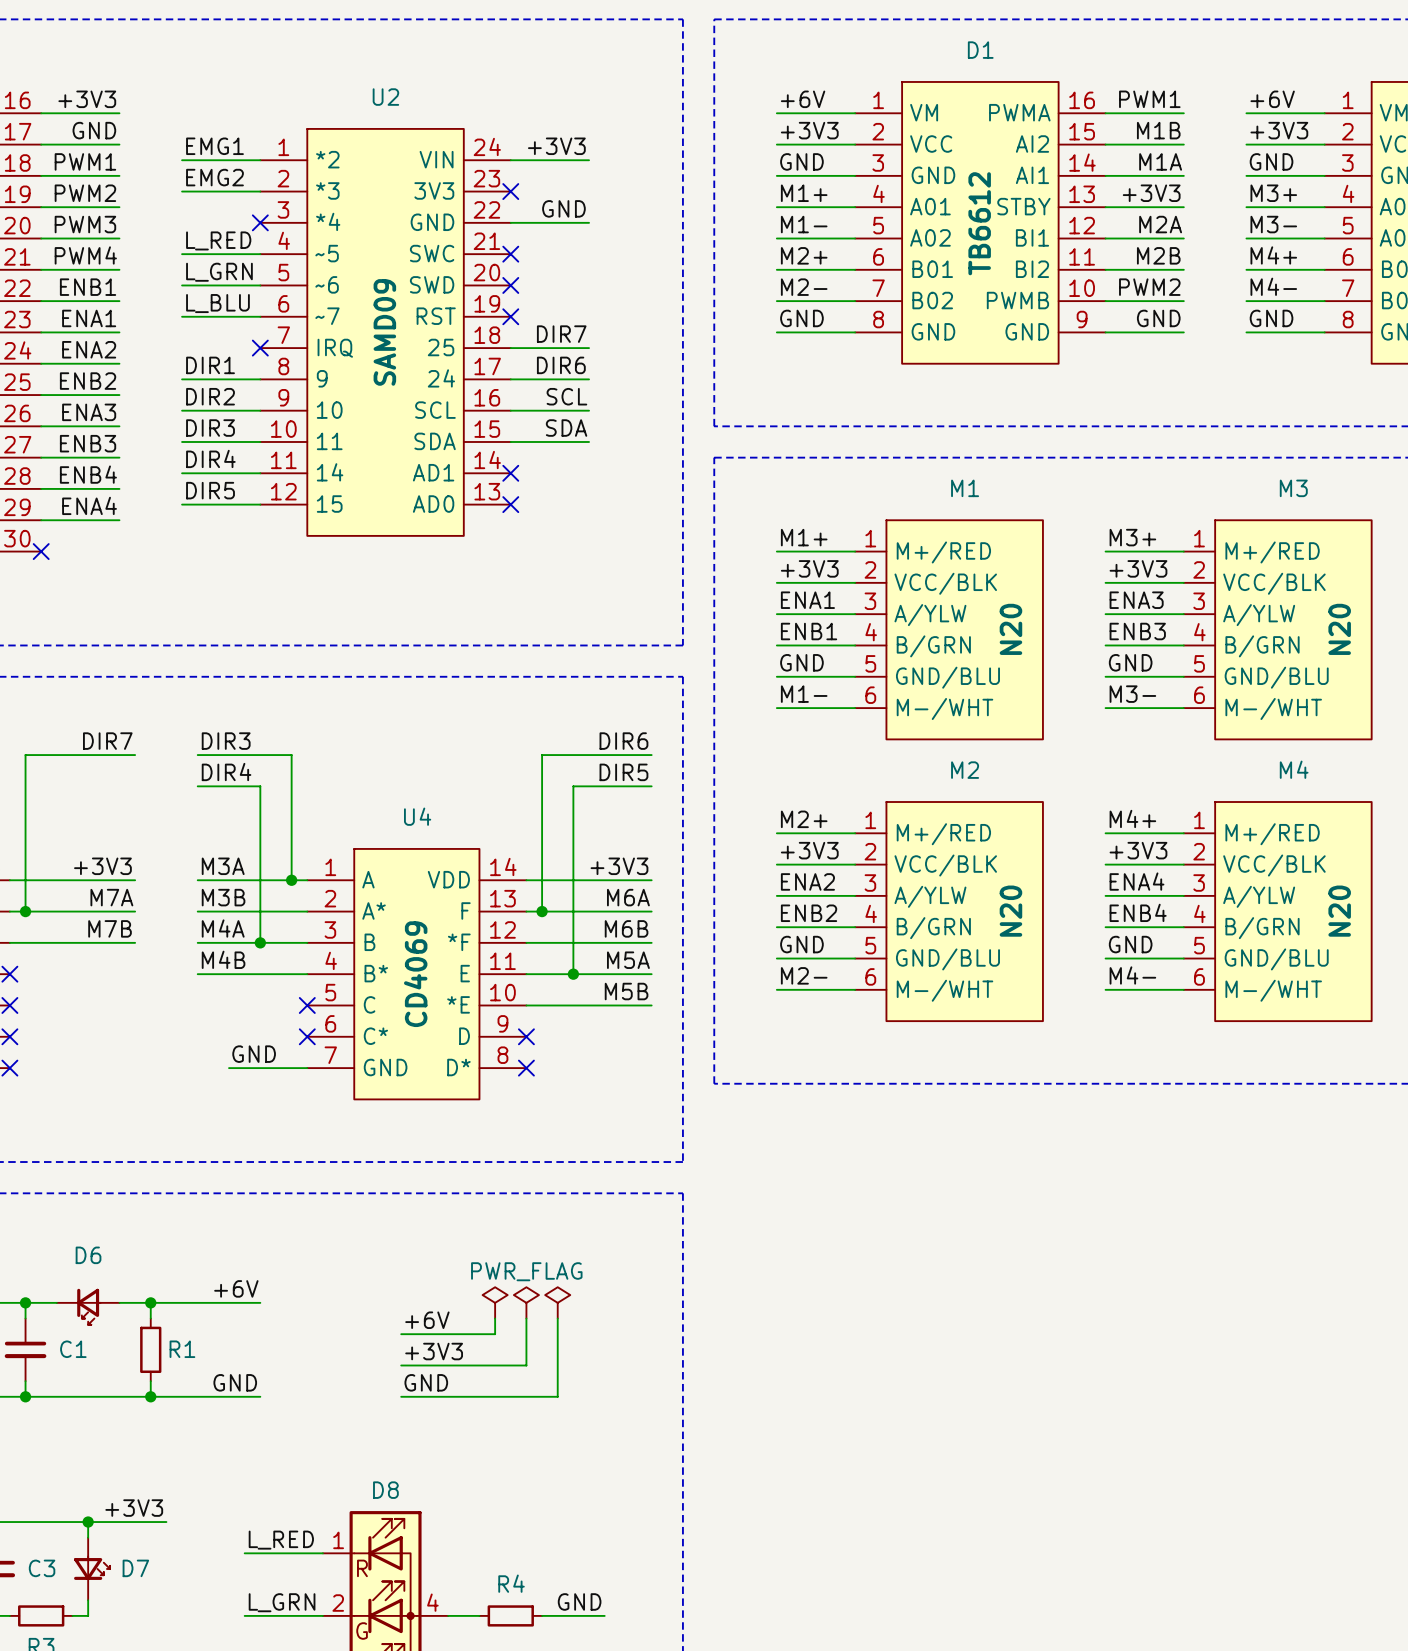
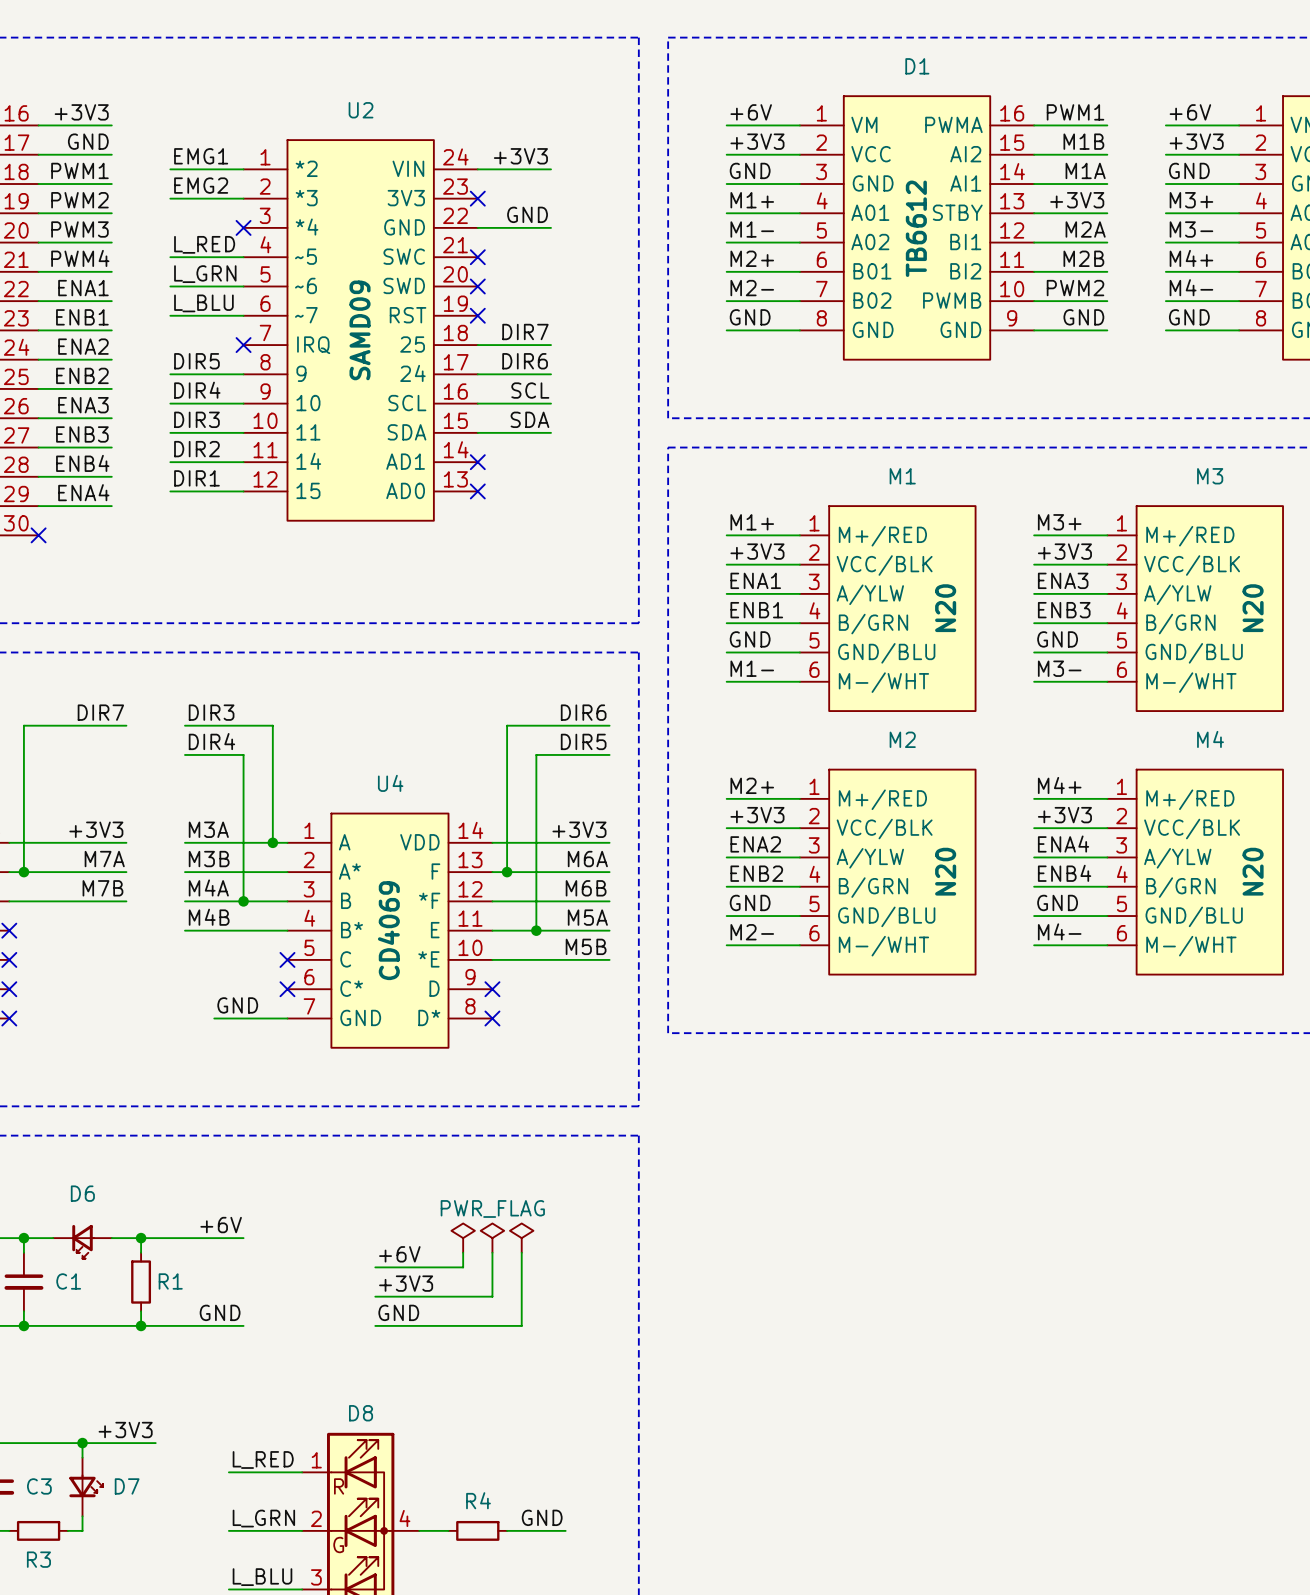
label: ENB1 (88, 287) -> ENA1 (83, 288)
label: ENA1 (89, 318) -> ENB1 (82, 317)
label: DIR1 (210, 365) -> DIR5 (196, 361)
label: DIR2 (210, 396) -> DIR4 (197, 390)
label: DIR4 (210, 458) -> DIR2 (196, 449)
label: DIR5 (210, 490) -> DIR1 (196, 478)

